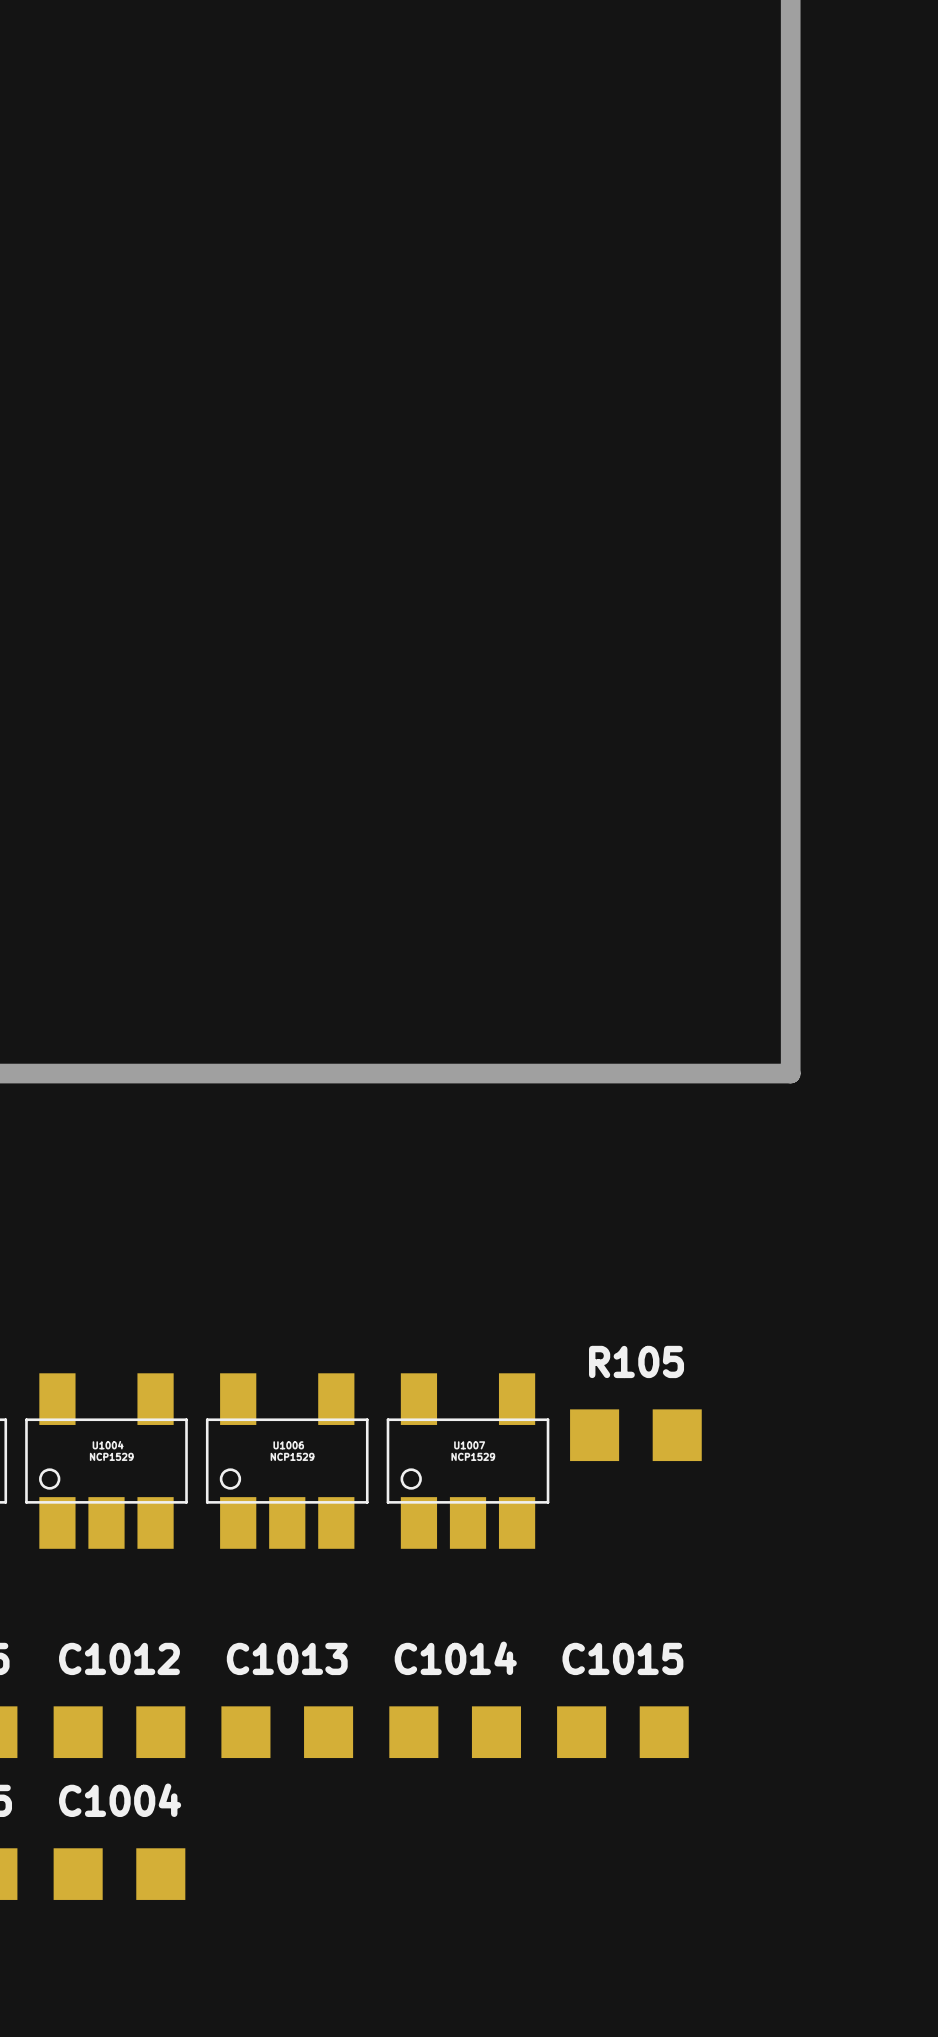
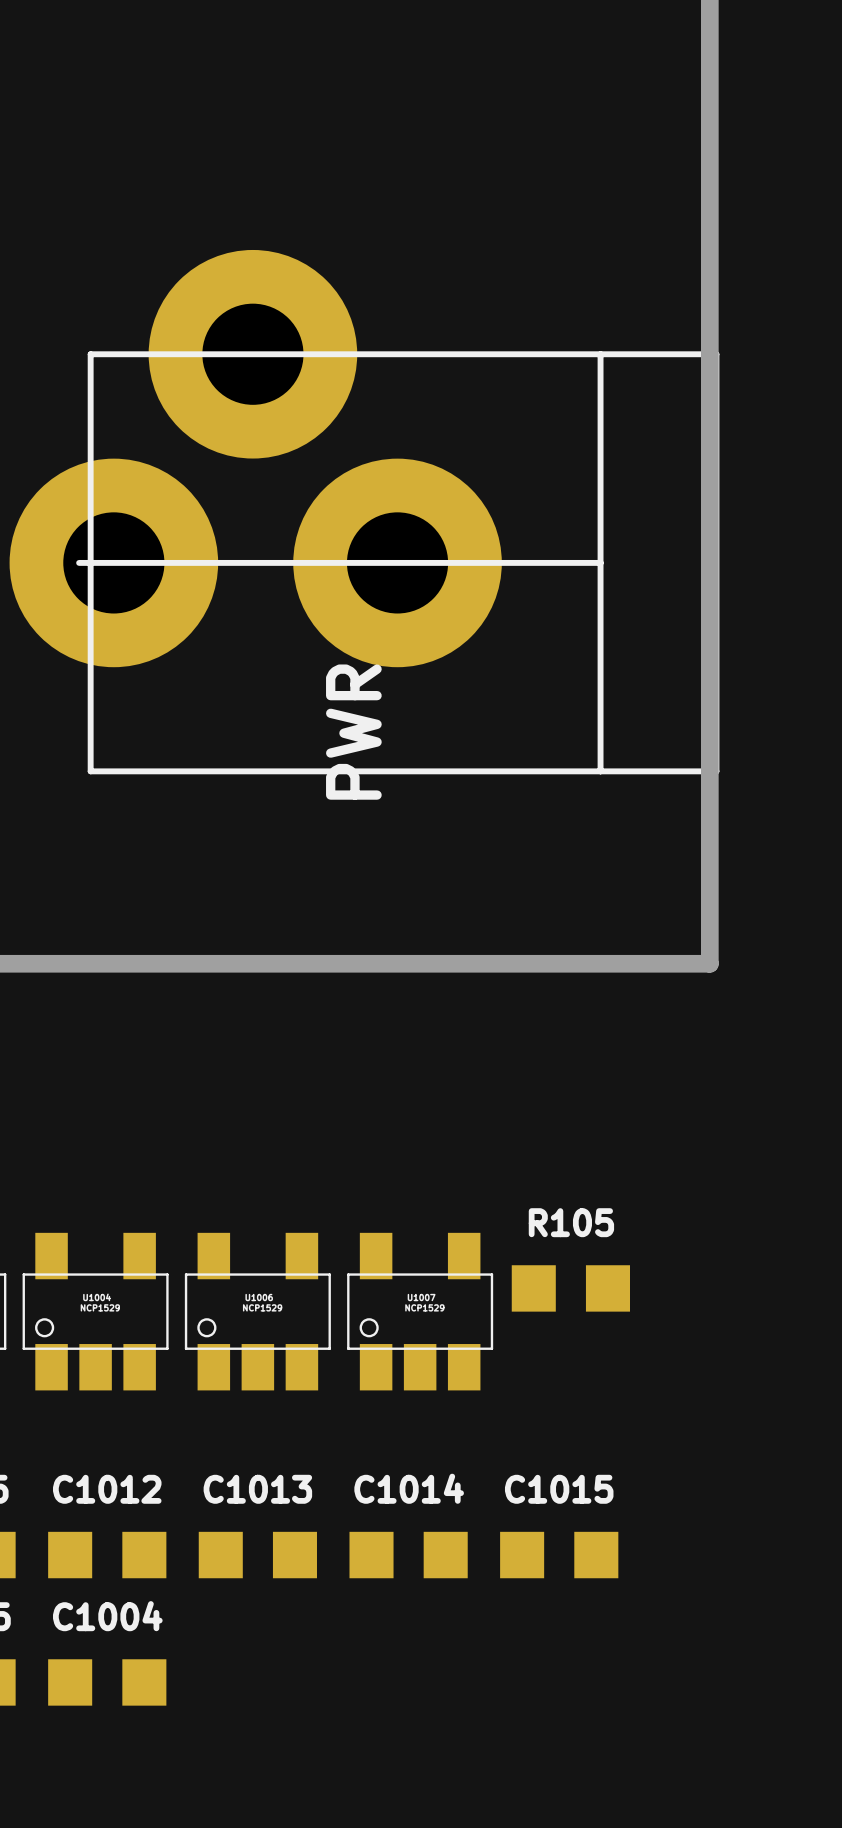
PWR: none -> (364, 512)

